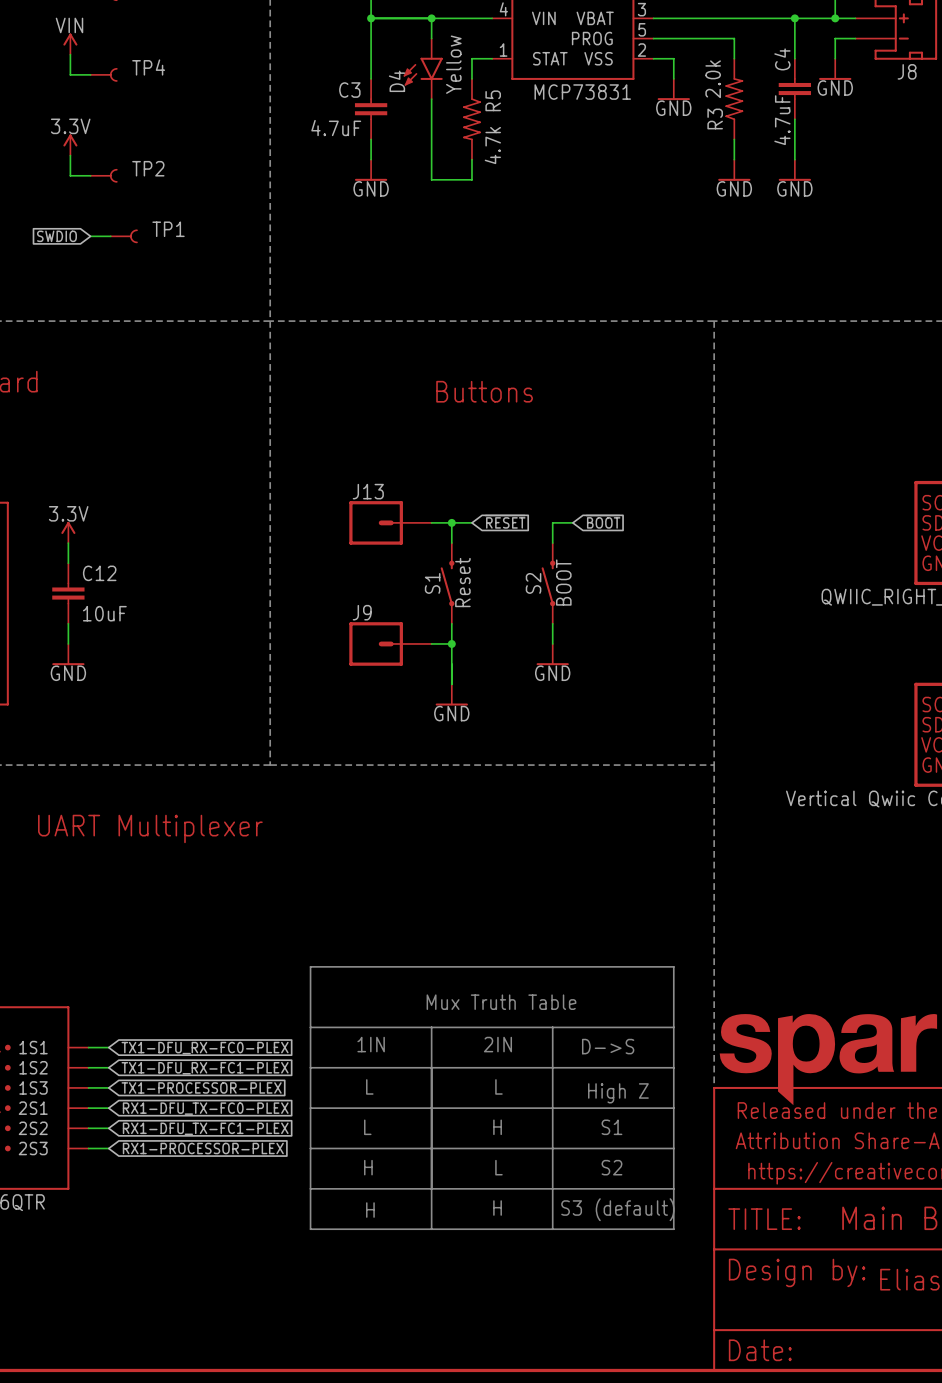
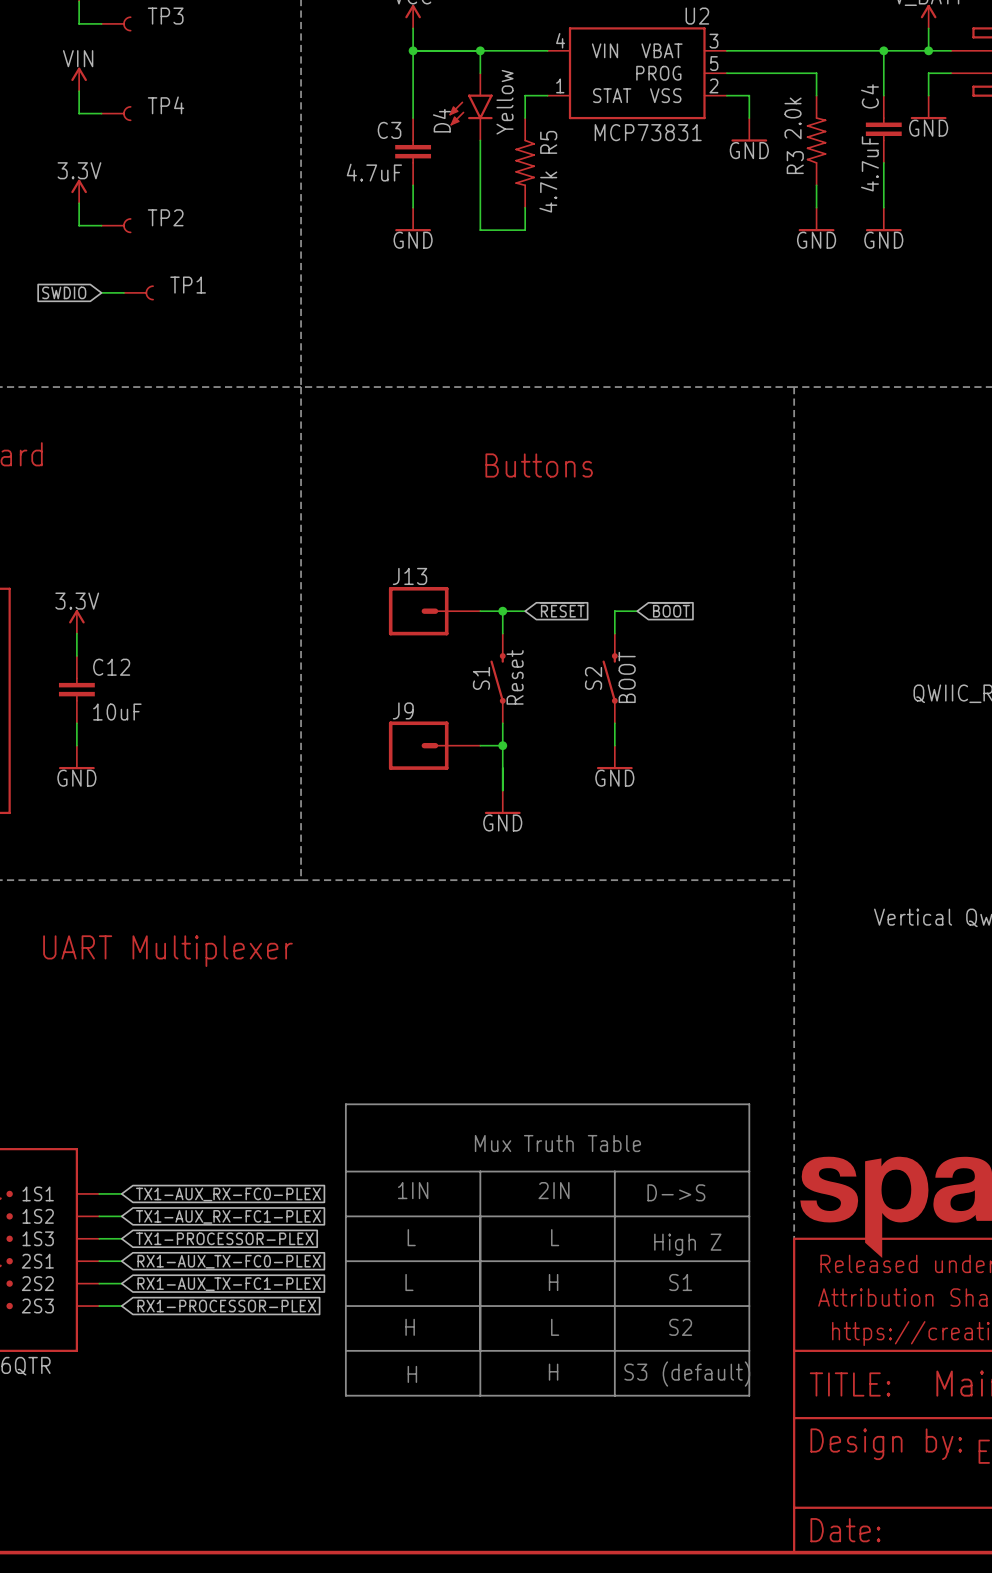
global label: TX1-DFU_RX-FC0-PLEX (205, 1048) -> TX1-AUX_RX-FC0-PLEX (228, 1194)
global label: TX1-DFU_RX-FC1-PLEX (205, 1068) -> TX1-AUX_RX-FC1-PLEX (228, 1216)
global label: RX1-DFU_TX-FC0-PLEX (205, 1108) -> RX1-AUX_TX-FC0-PLEX (229, 1261)
global label: RX1-DFU_TX-FC1-PLEX (205, 1128) -> RX1-AUX_TX-FC1-PLEX (229, 1284)

